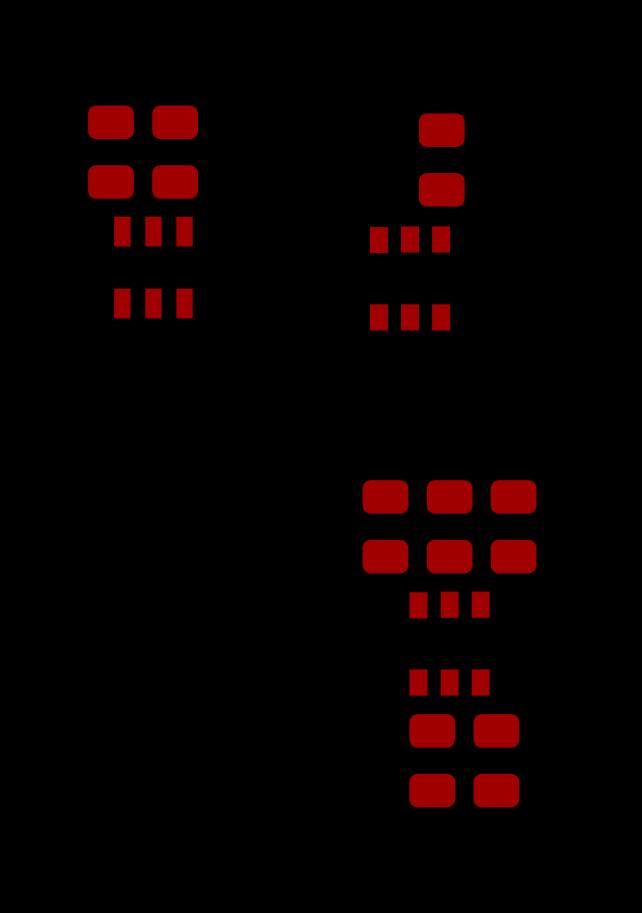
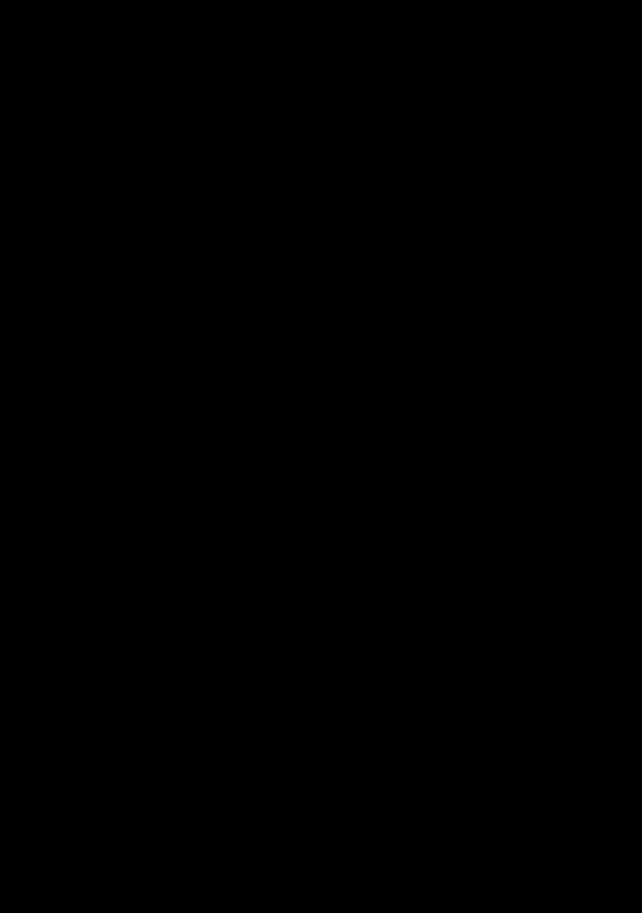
part: (110, 152) -> none
part: (175, 152) -> none
part: (441, 159) -> none
part: (153, 267) -> none
part: (410, 278) -> none
part: (385, 526) -> none
part: (449, 526) -> none
part: (513, 526) -> none
part: (449, 643) -> none
part: (432, 760) -> none
part: (496, 760) -> none

